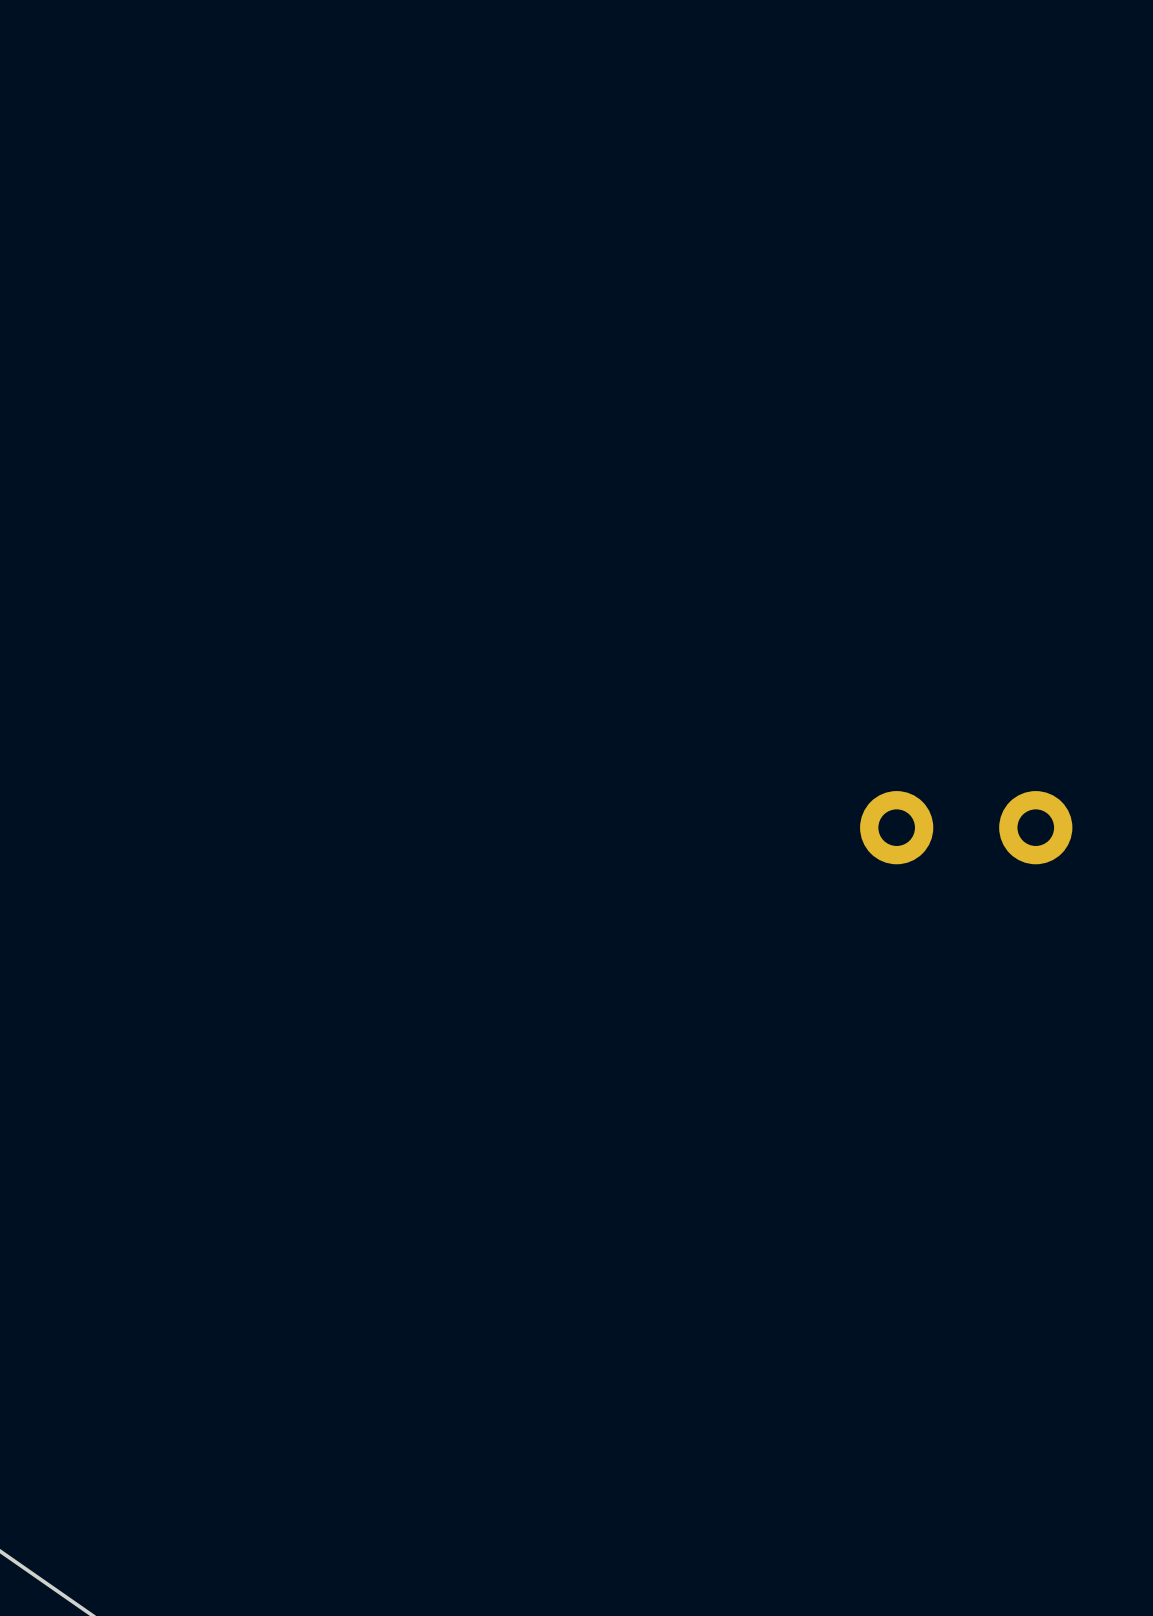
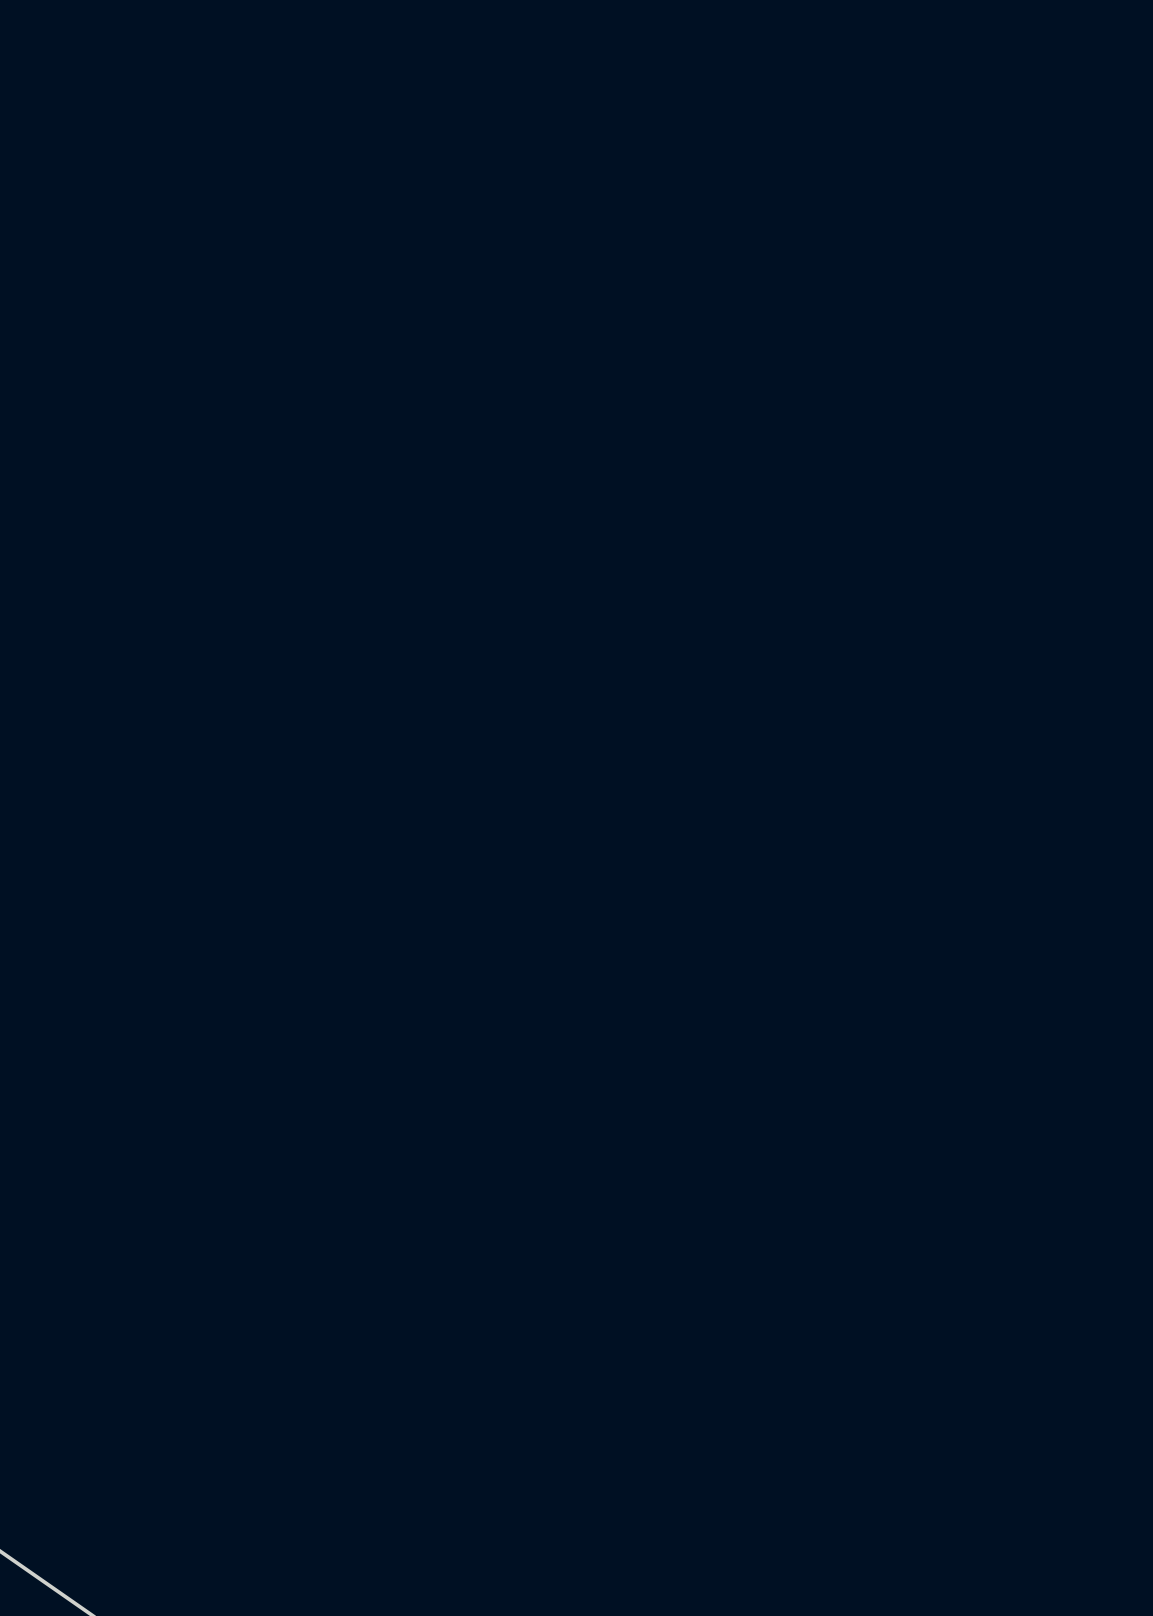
part: (896, 827) -> none
part: (1035, 827) -> none

